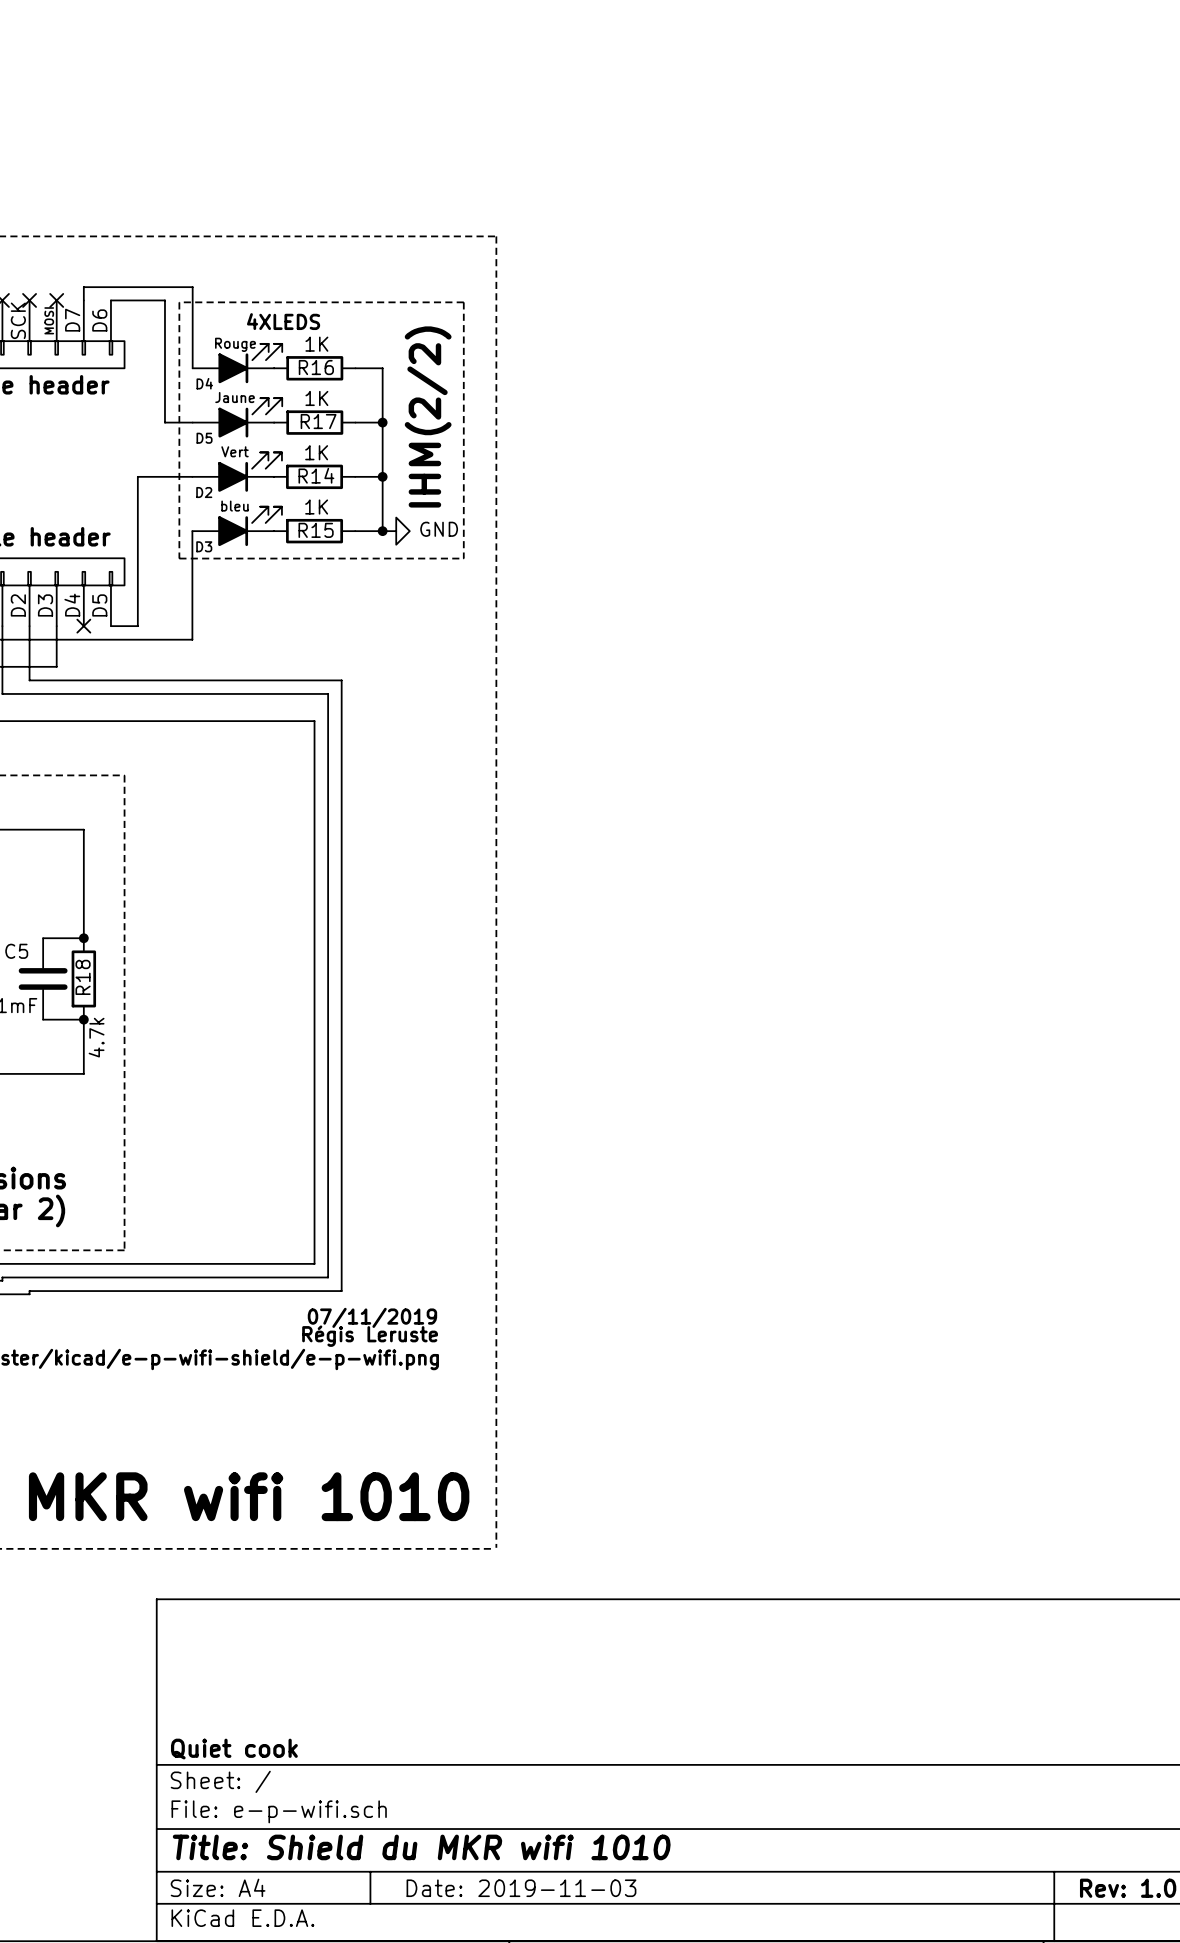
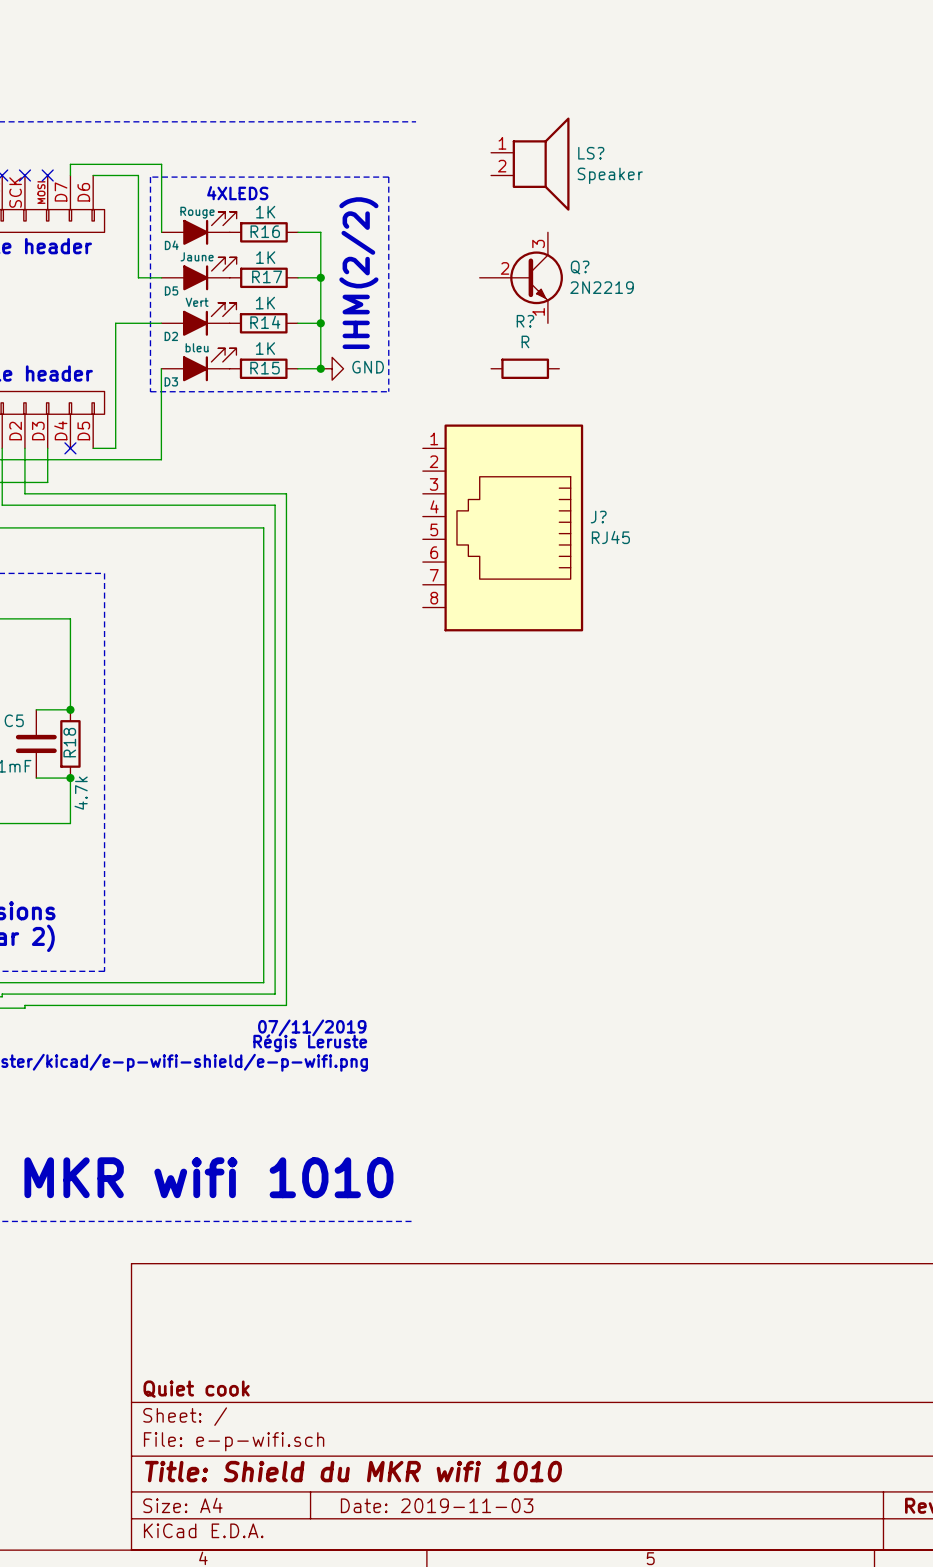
line: (496, 236) (496, 1547) -> none
LS?: none -> Speaker (530, 164)
Q?: none -> 2N2219 (521, 277)
R?: none -> R (525, 368)
J?: none -> RJ45 (503, 527)

